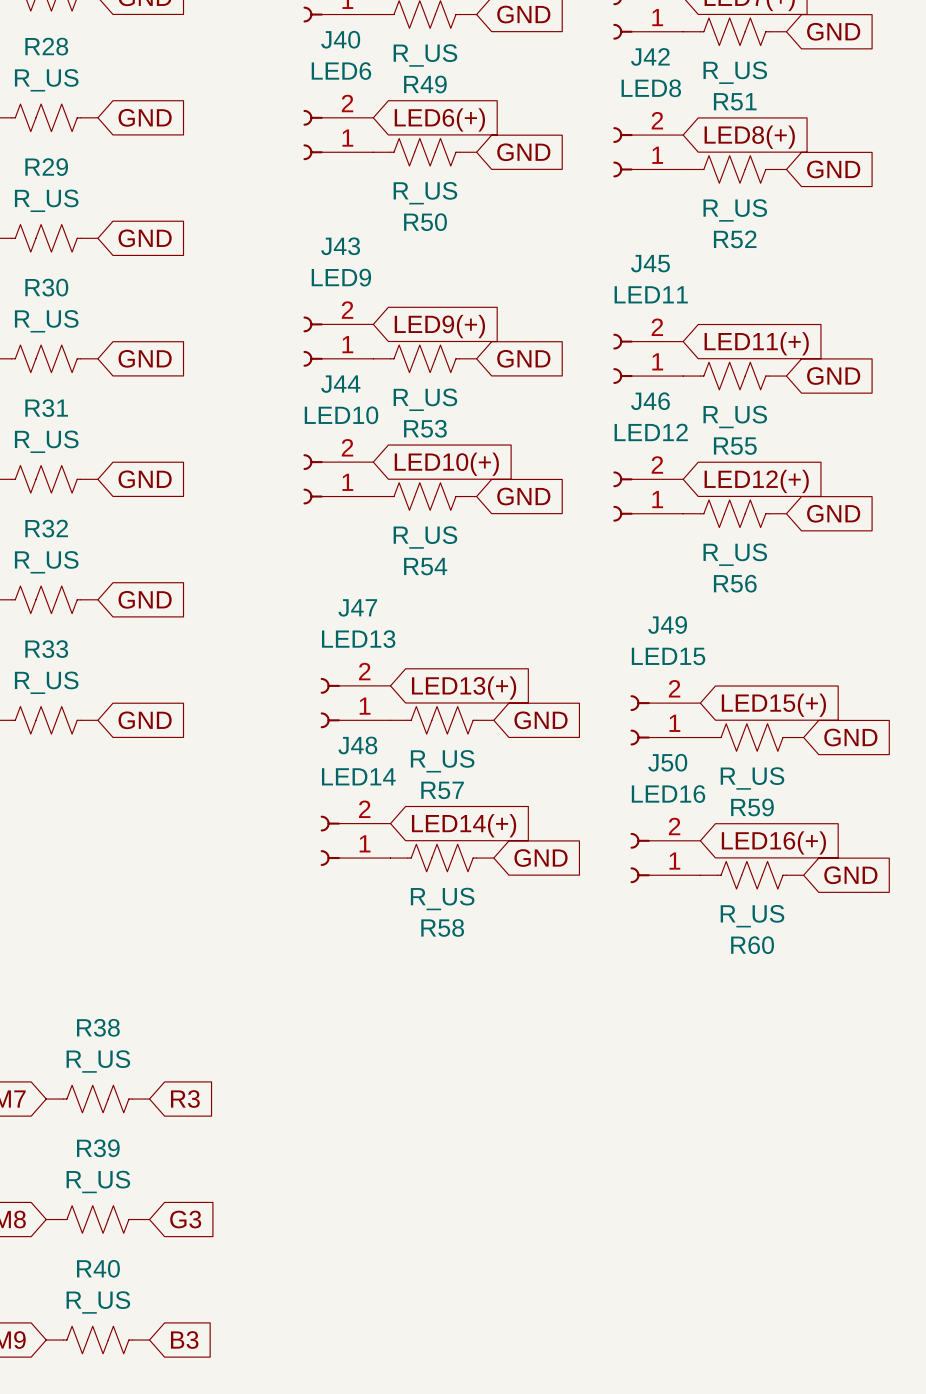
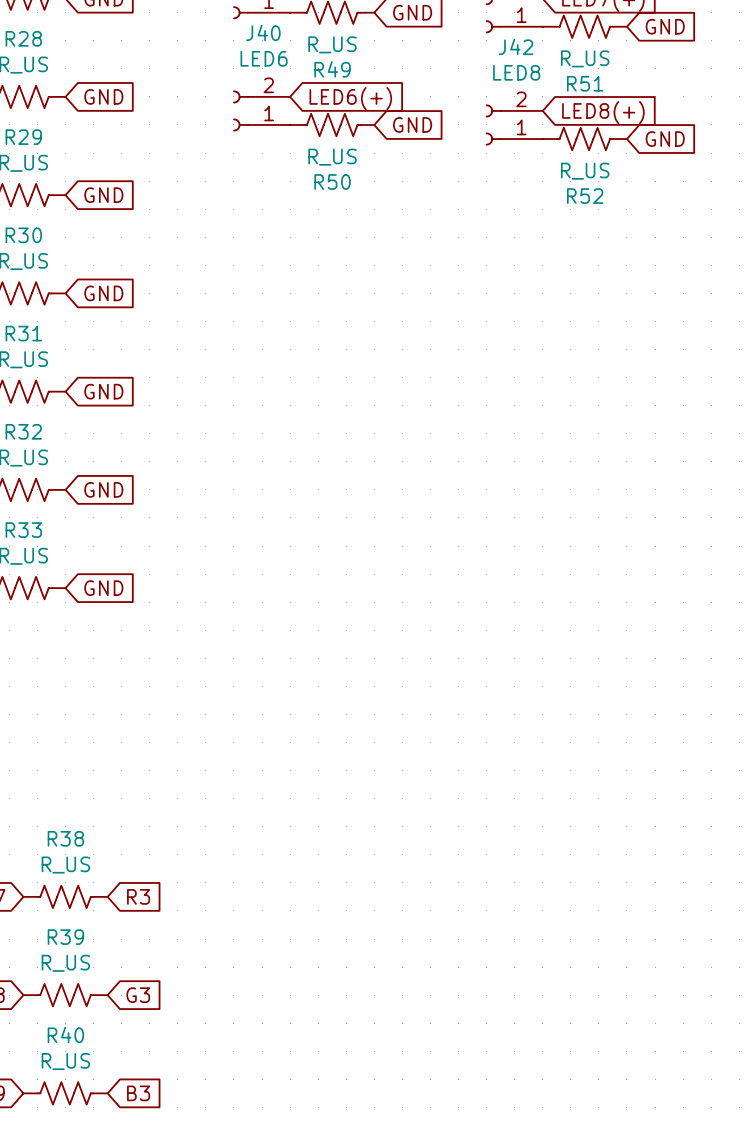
global label: LED9(+) (439, 326) -> none
J43: LED9 (338, 341) -> none
global label: LED11(+) (756, 343) -> none
R53: R_US (424, 358) -> none
global label: GND (523, 358) -> none
J45: LED11 (648, 358) -> none
R55: R_US (734, 376) -> none
global label: GND (833, 376) -> none
global label: LED10(+) (446, 464) -> none
J44: LED10 (338, 479) -> none
global label: LED12(+) (756, 481) -> none
R54: R_US (424, 496) -> none
global label: GND (523, 496) -> none
J46: LED12 (648, 496) -> none
R56: R_US (734, 513) -> none
global label: GND (833, 513) -> none
global label: LED13(+) (464, 688) -> none
J47: LED13 (355, 703) -> none
global label: LED15(+) (773, 705) -> none
R57: R_US (442, 720) -> none
global label: GND (541, 720) -> none
J49: LED15 (665, 720) -> none
R59: R_US (752, 737) -> none
global label: GND (850, 737) -> none
global label: LED14(+) (464, 825) -> none
J48: LED14 (355, 840) -> none
global label: LED16(+) (773, 842) -> none
R58: R_US (442, 858) -> none
global label: GND (541, 858) -> none
J50: LED16 (665, 858) -> none
R60: R_US (752, 875) -> none
global label: GND (850, 875) -> none

